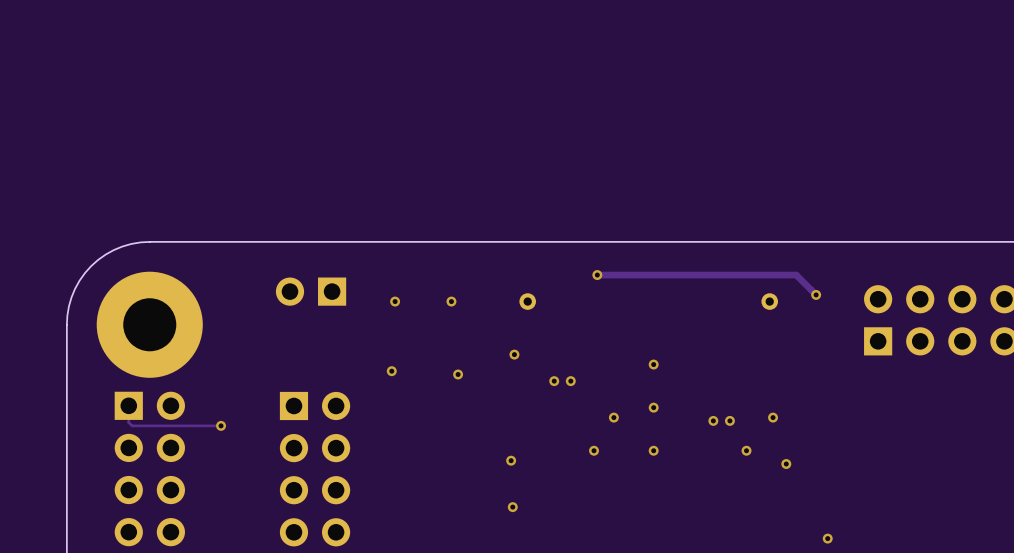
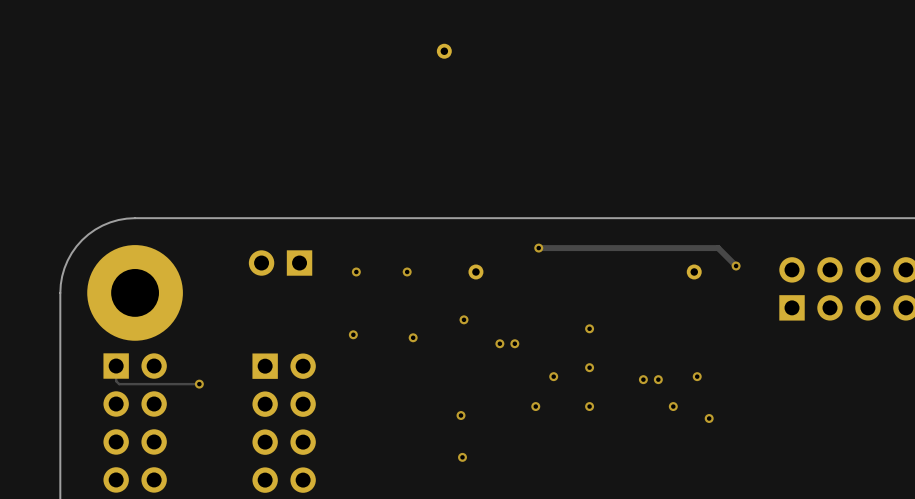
part: none -> (444, 51)
via: (827, 538) -> none

